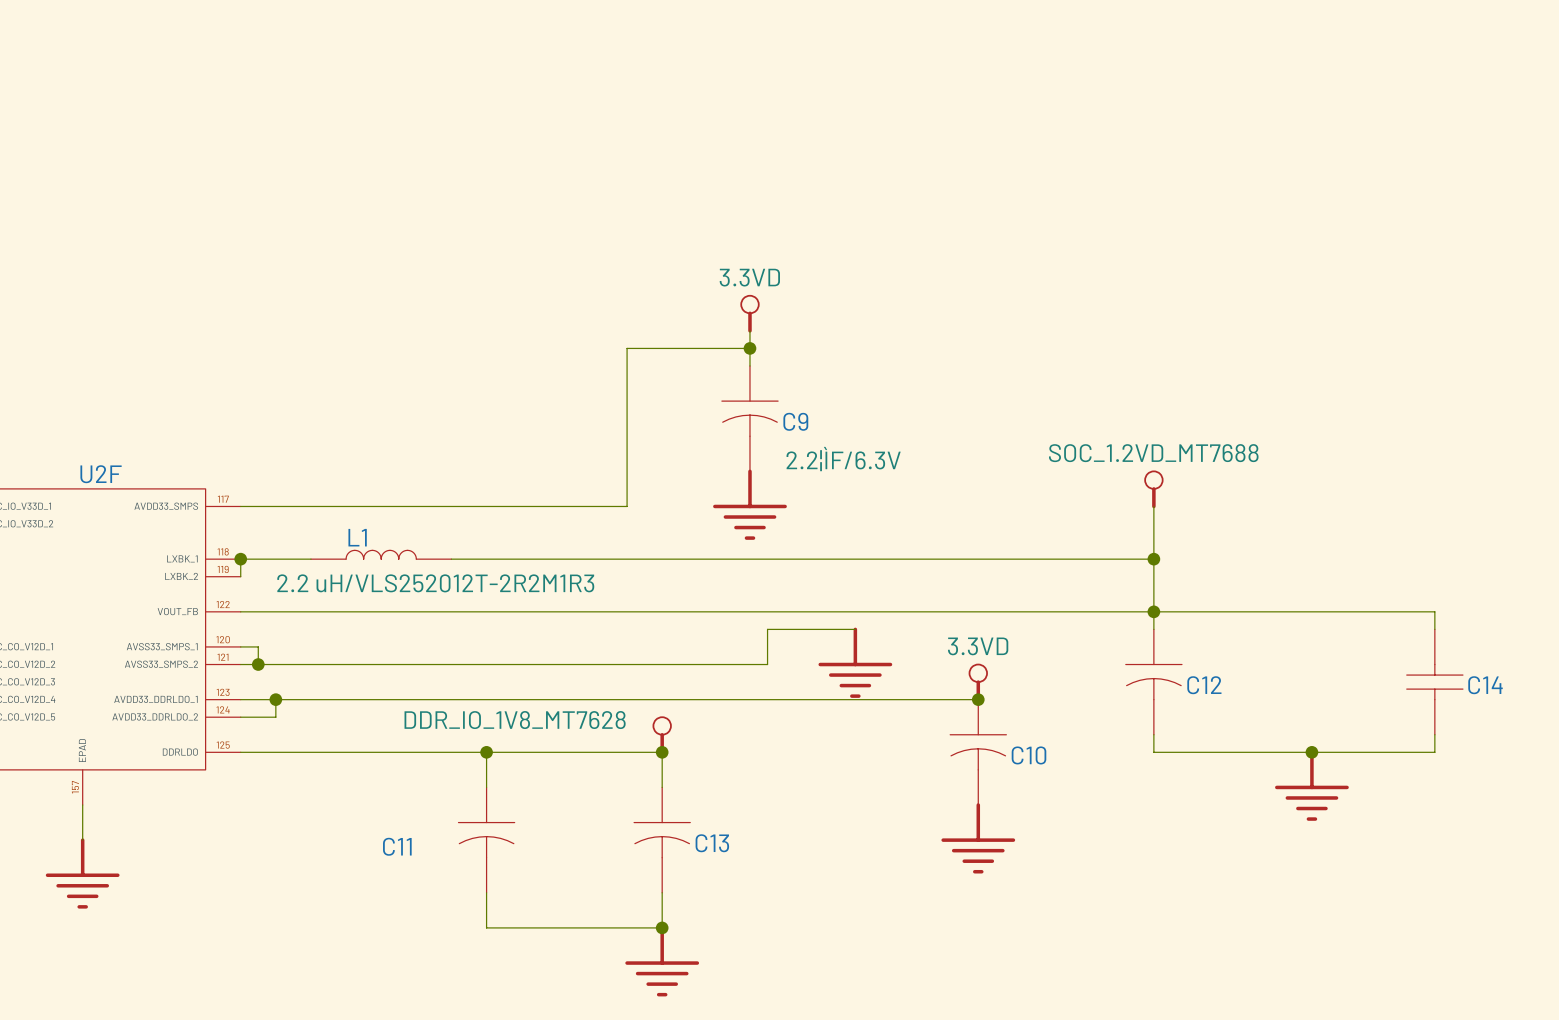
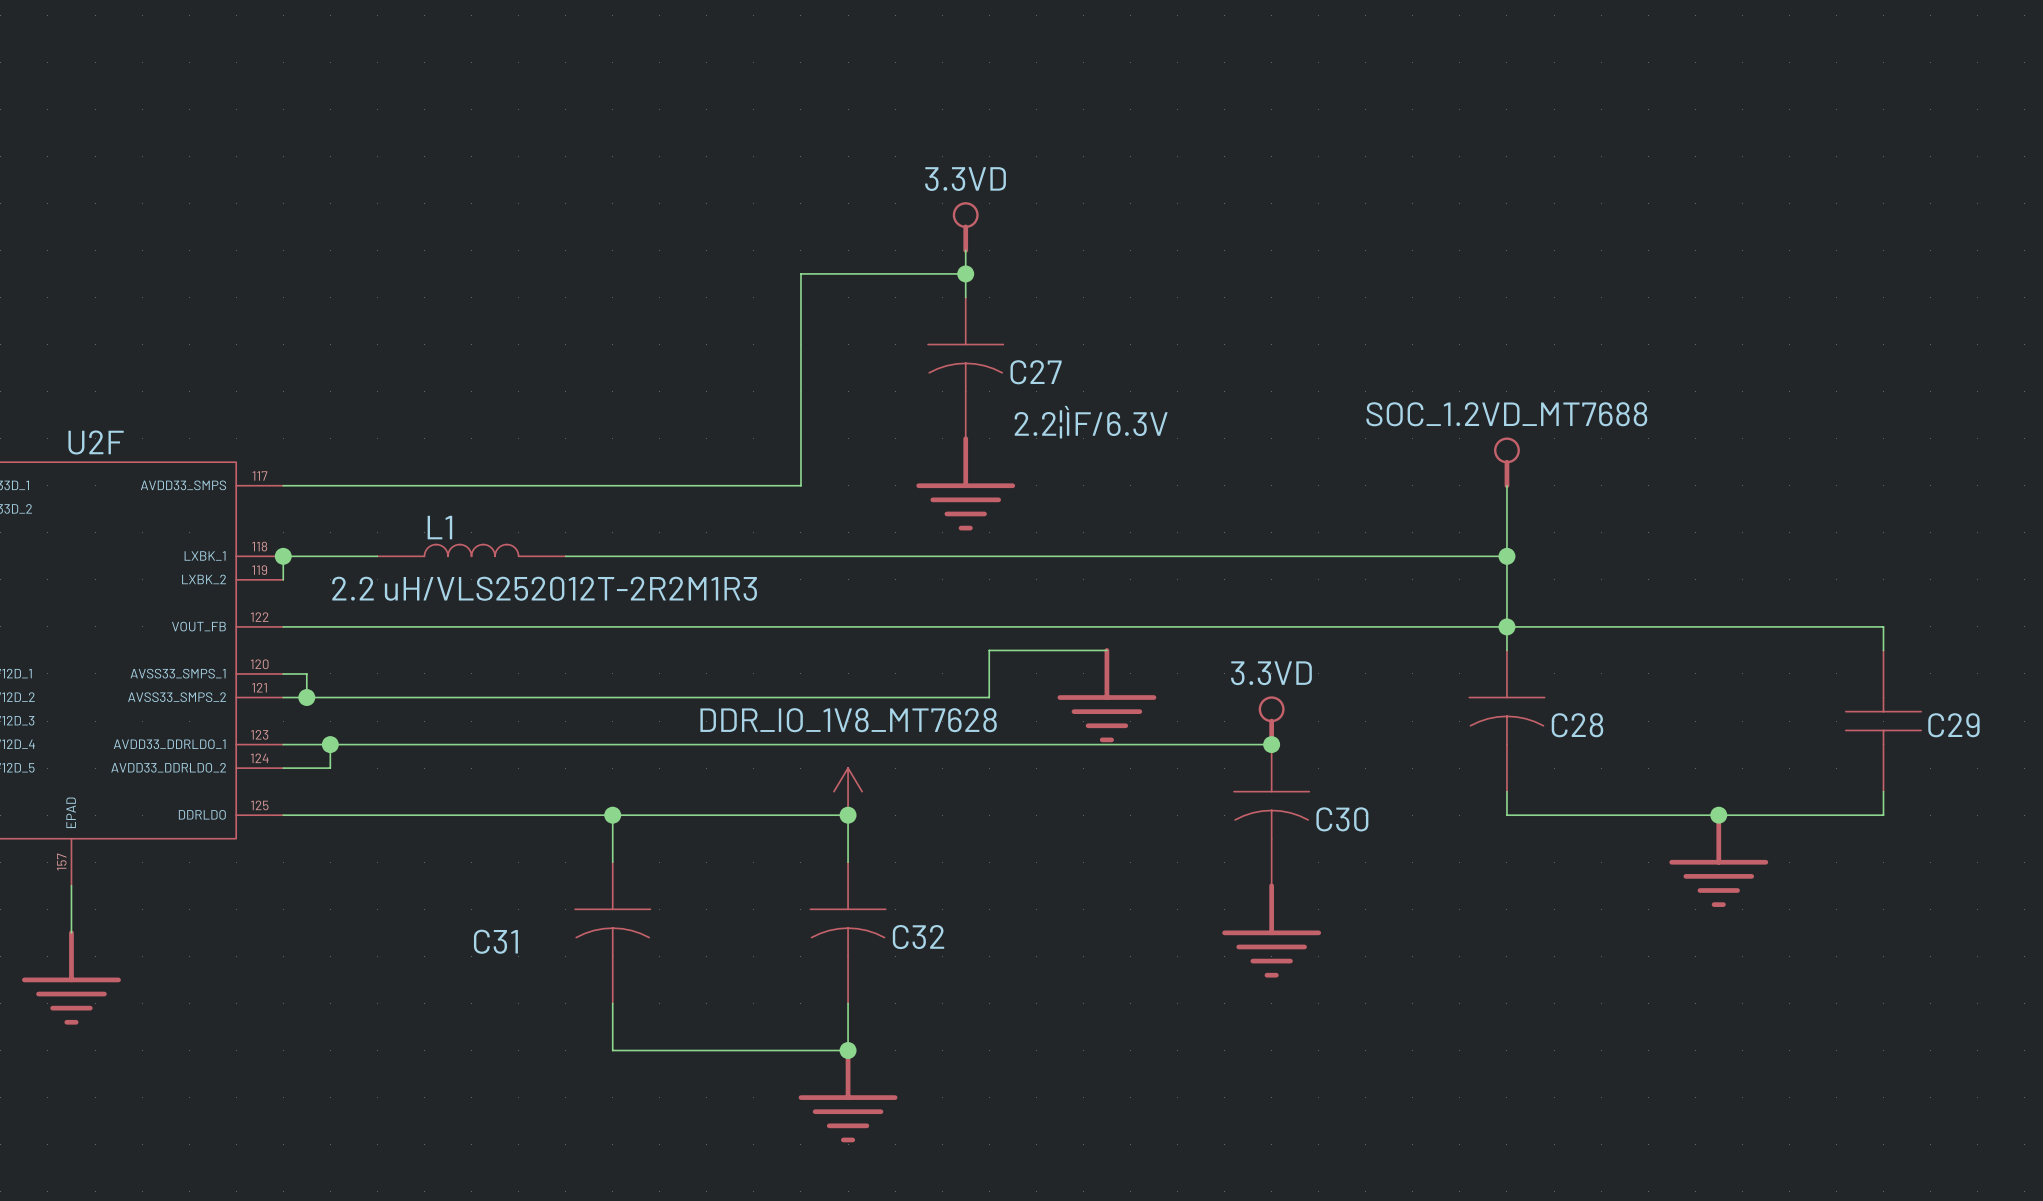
C9 name: C9 (795, 421) -> C27 (1036, 372)
C12 name: C12 (1204, 685) -> C28 (1577, 725)
C14 name: C14 (1485, 685) -> C29 (1953, 725)
power symbol shape: [652, 716, 672, 755] -> [833, 768, 863, 816]
power symbol text position: DDR_IO_1V8_MT7628 (515, 720) -> DDR_IO_1V8_MT7628 (848, 720)
C10 name: C10 (1028, 755) -> C30 (1342, 819)
C13 name: C13 (712, 843) -> C32 (918, 937)
C11 name: C11 (397, 846) -> C31 (495, 941)

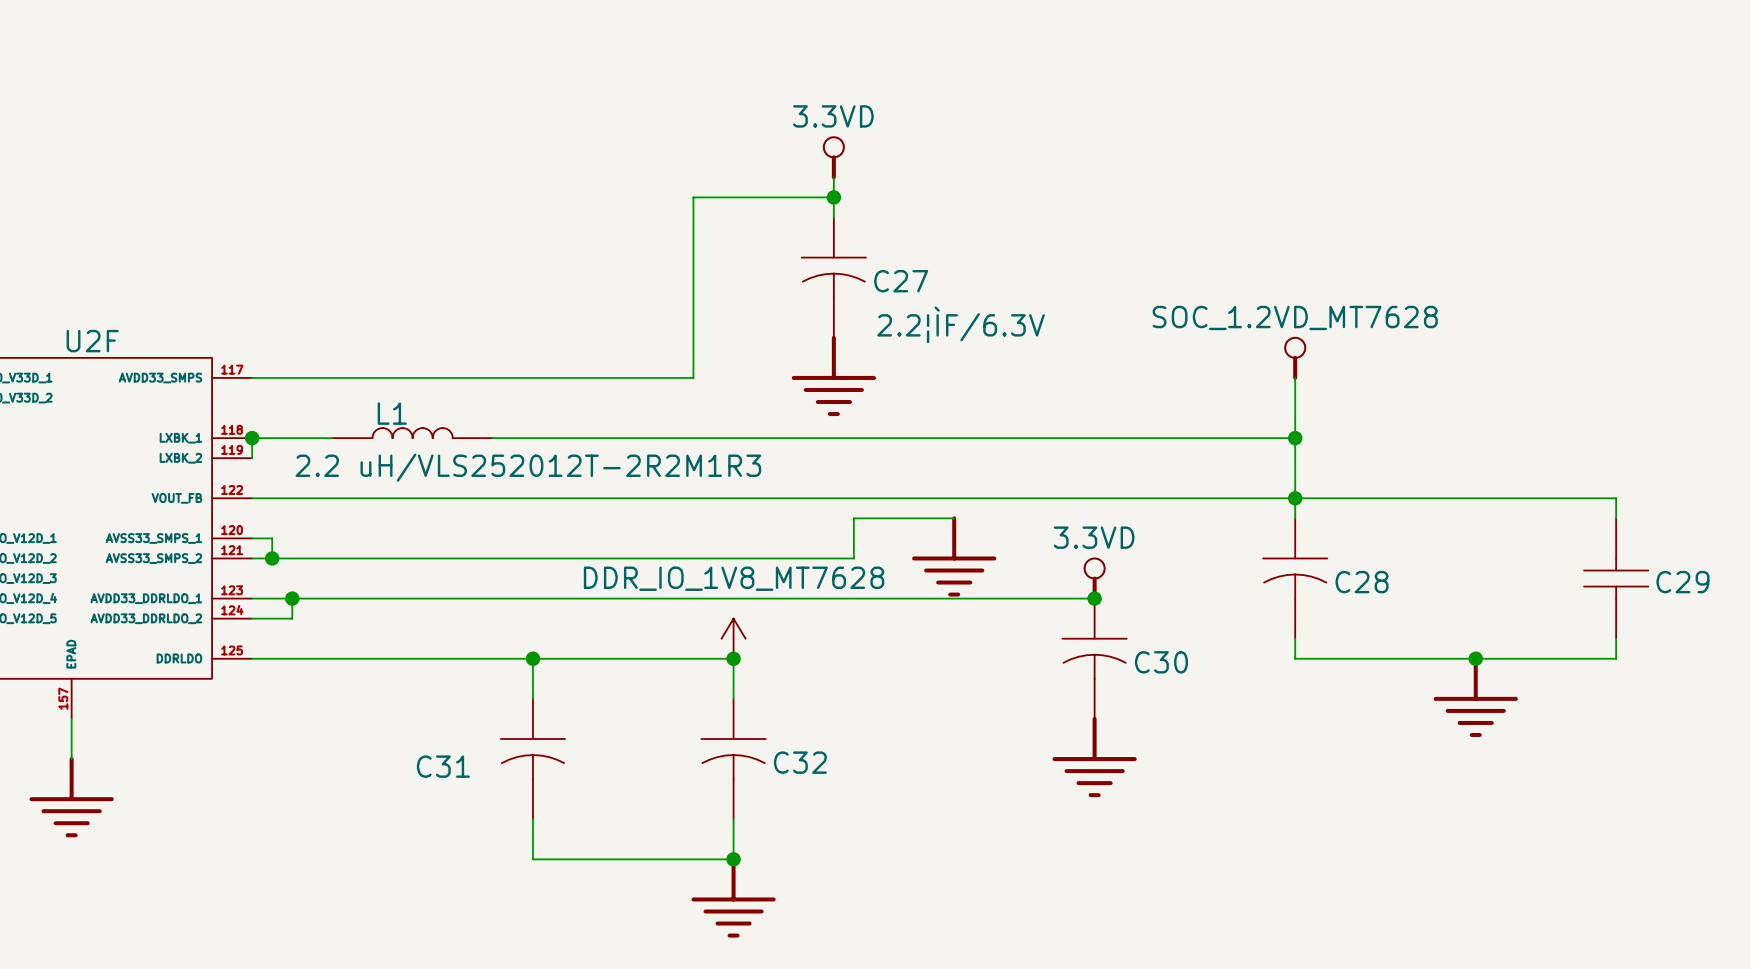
power symbol: SOC_1.2VD_MT7688 (1506, 462) -> SOC_1.2VD_MT7628 (1295, 358)

